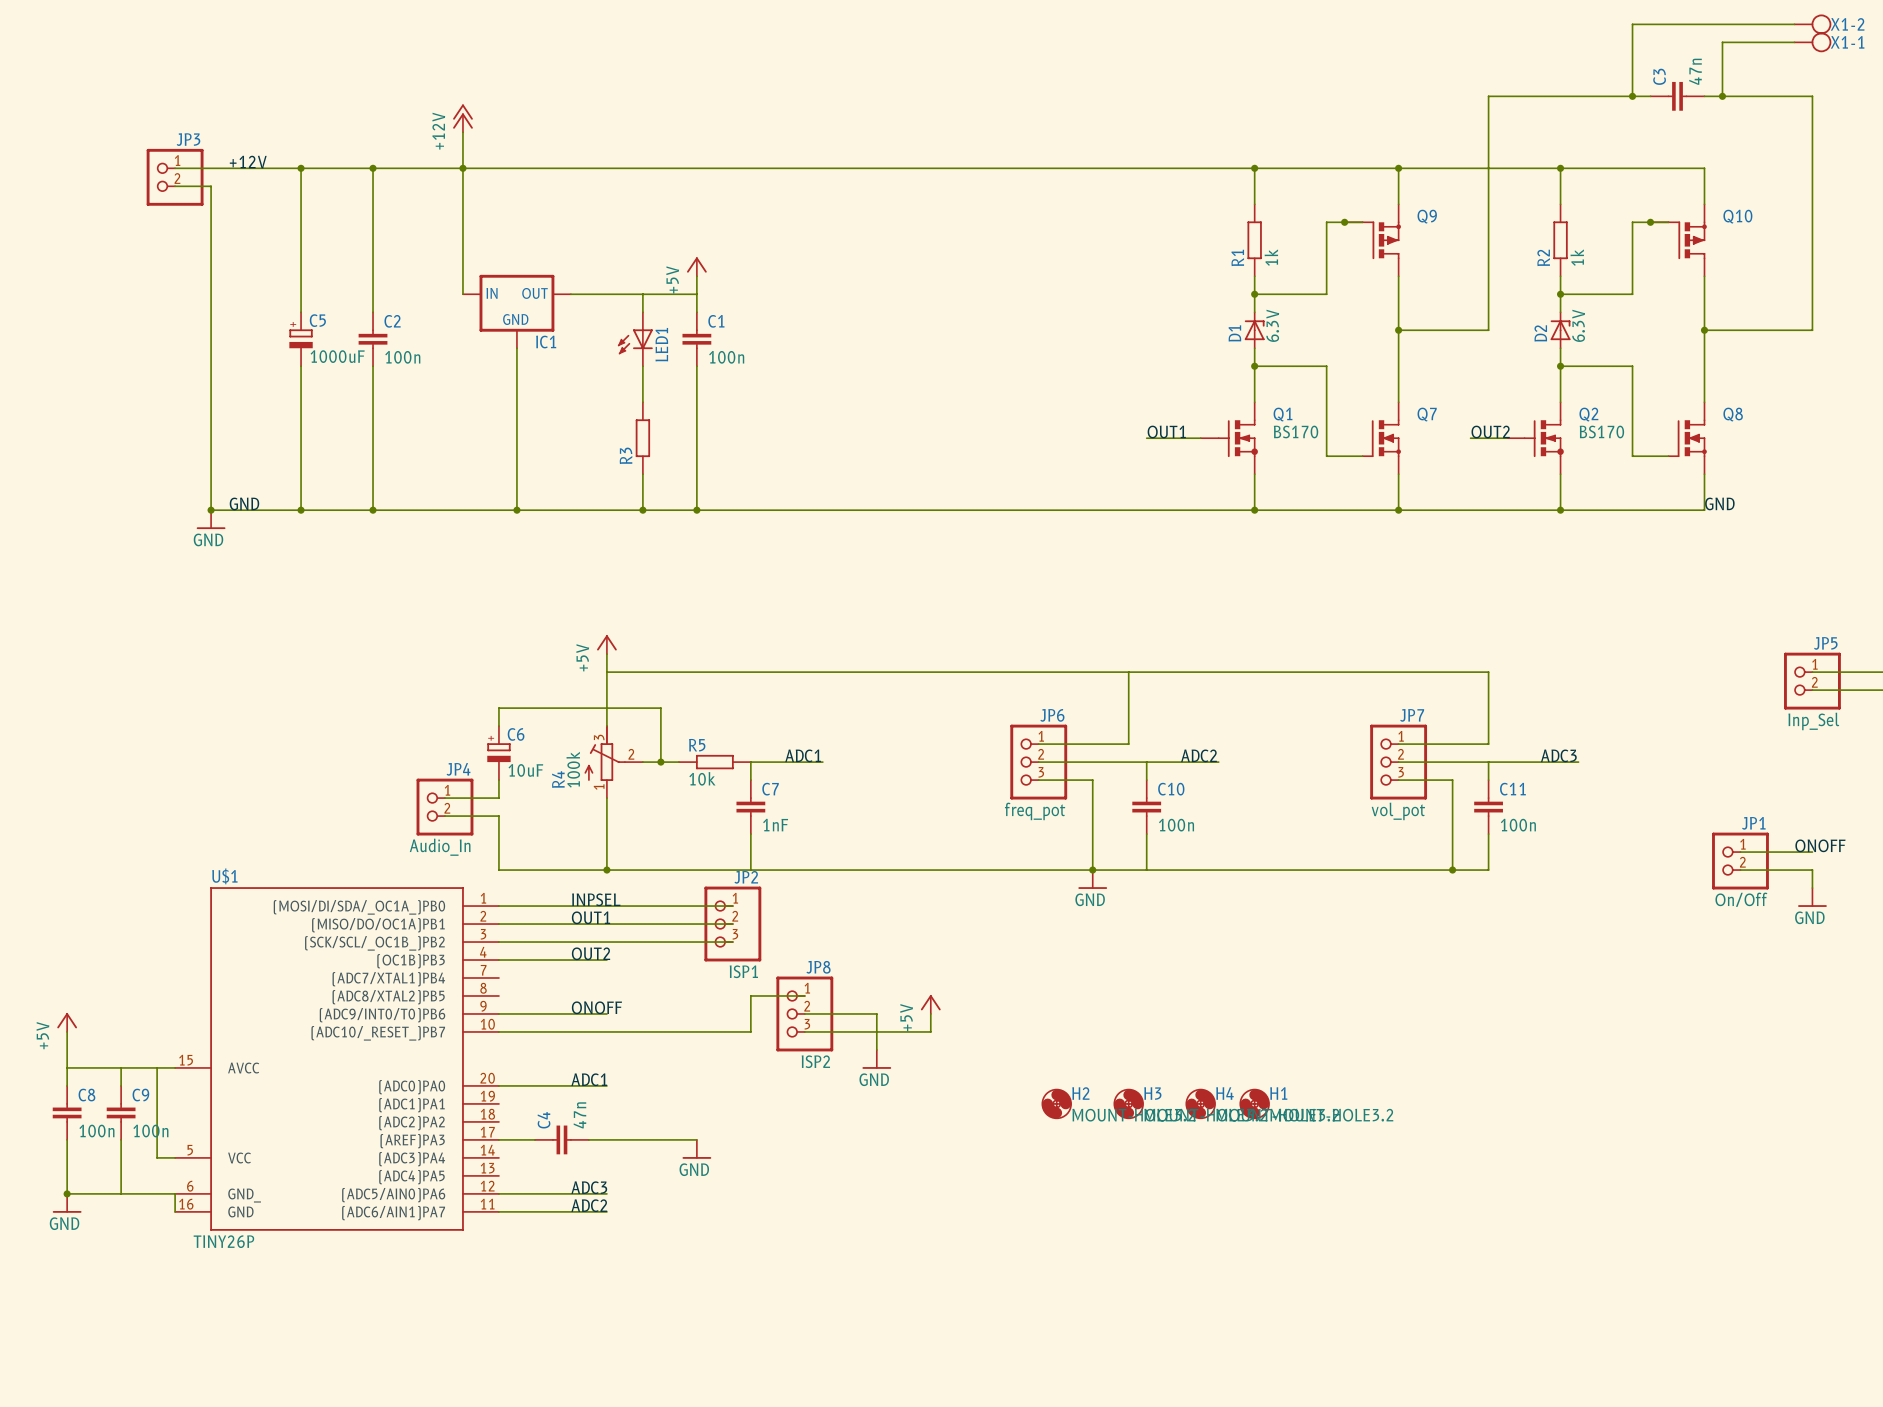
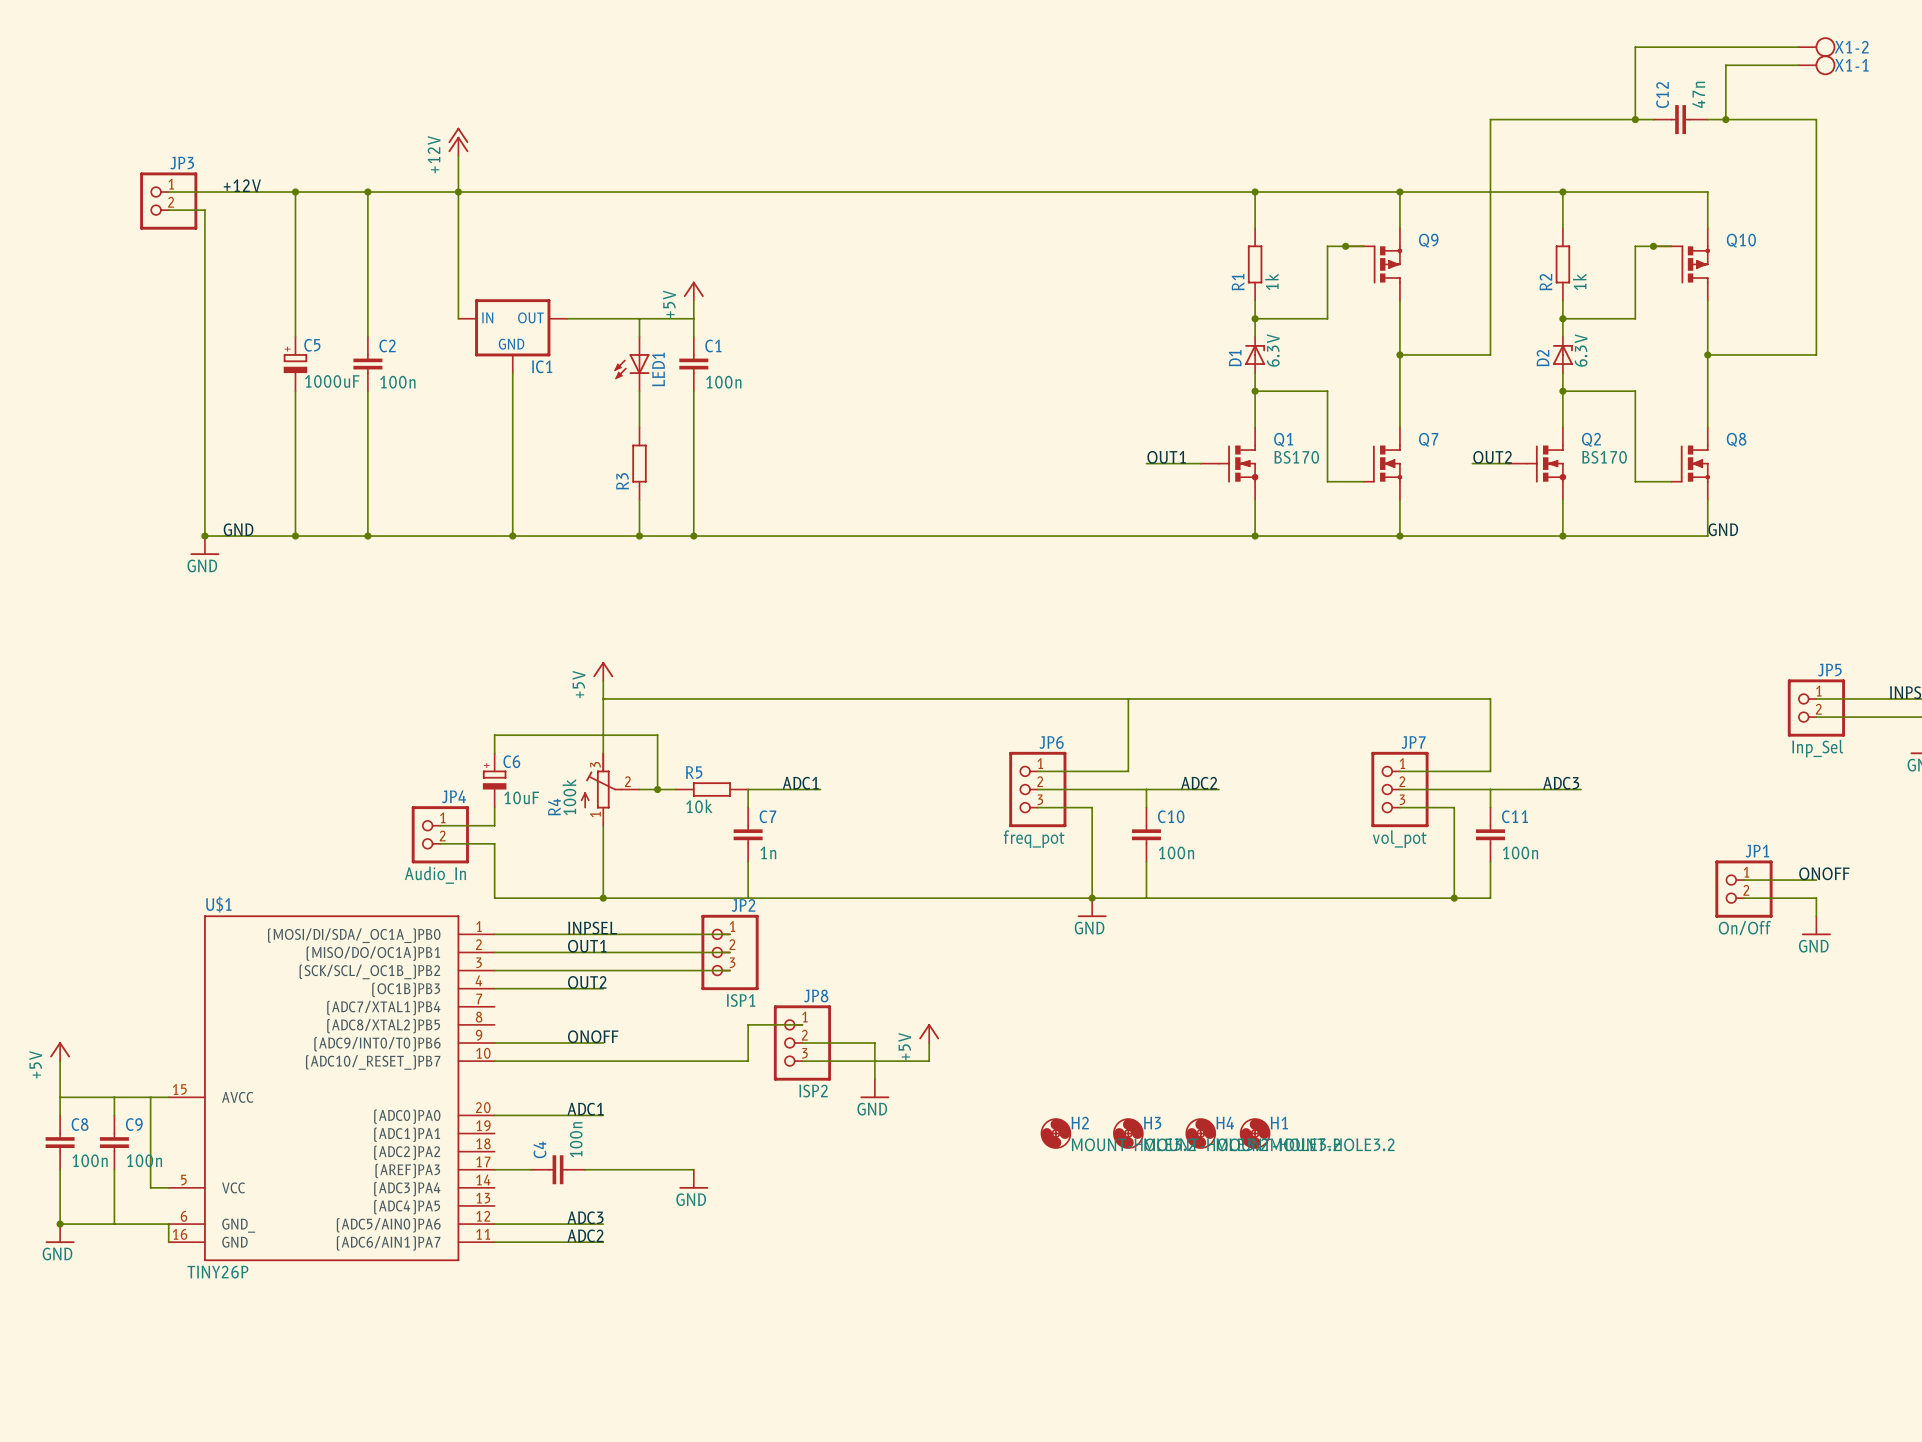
C3 name: C3 (1659, 76) -> C12 (1662, 95)
C7 value: 1nF (775, 825) -> 1n (768, 852)
C4 value: 47n (579, 1115) -> 100n (576, 1139)

